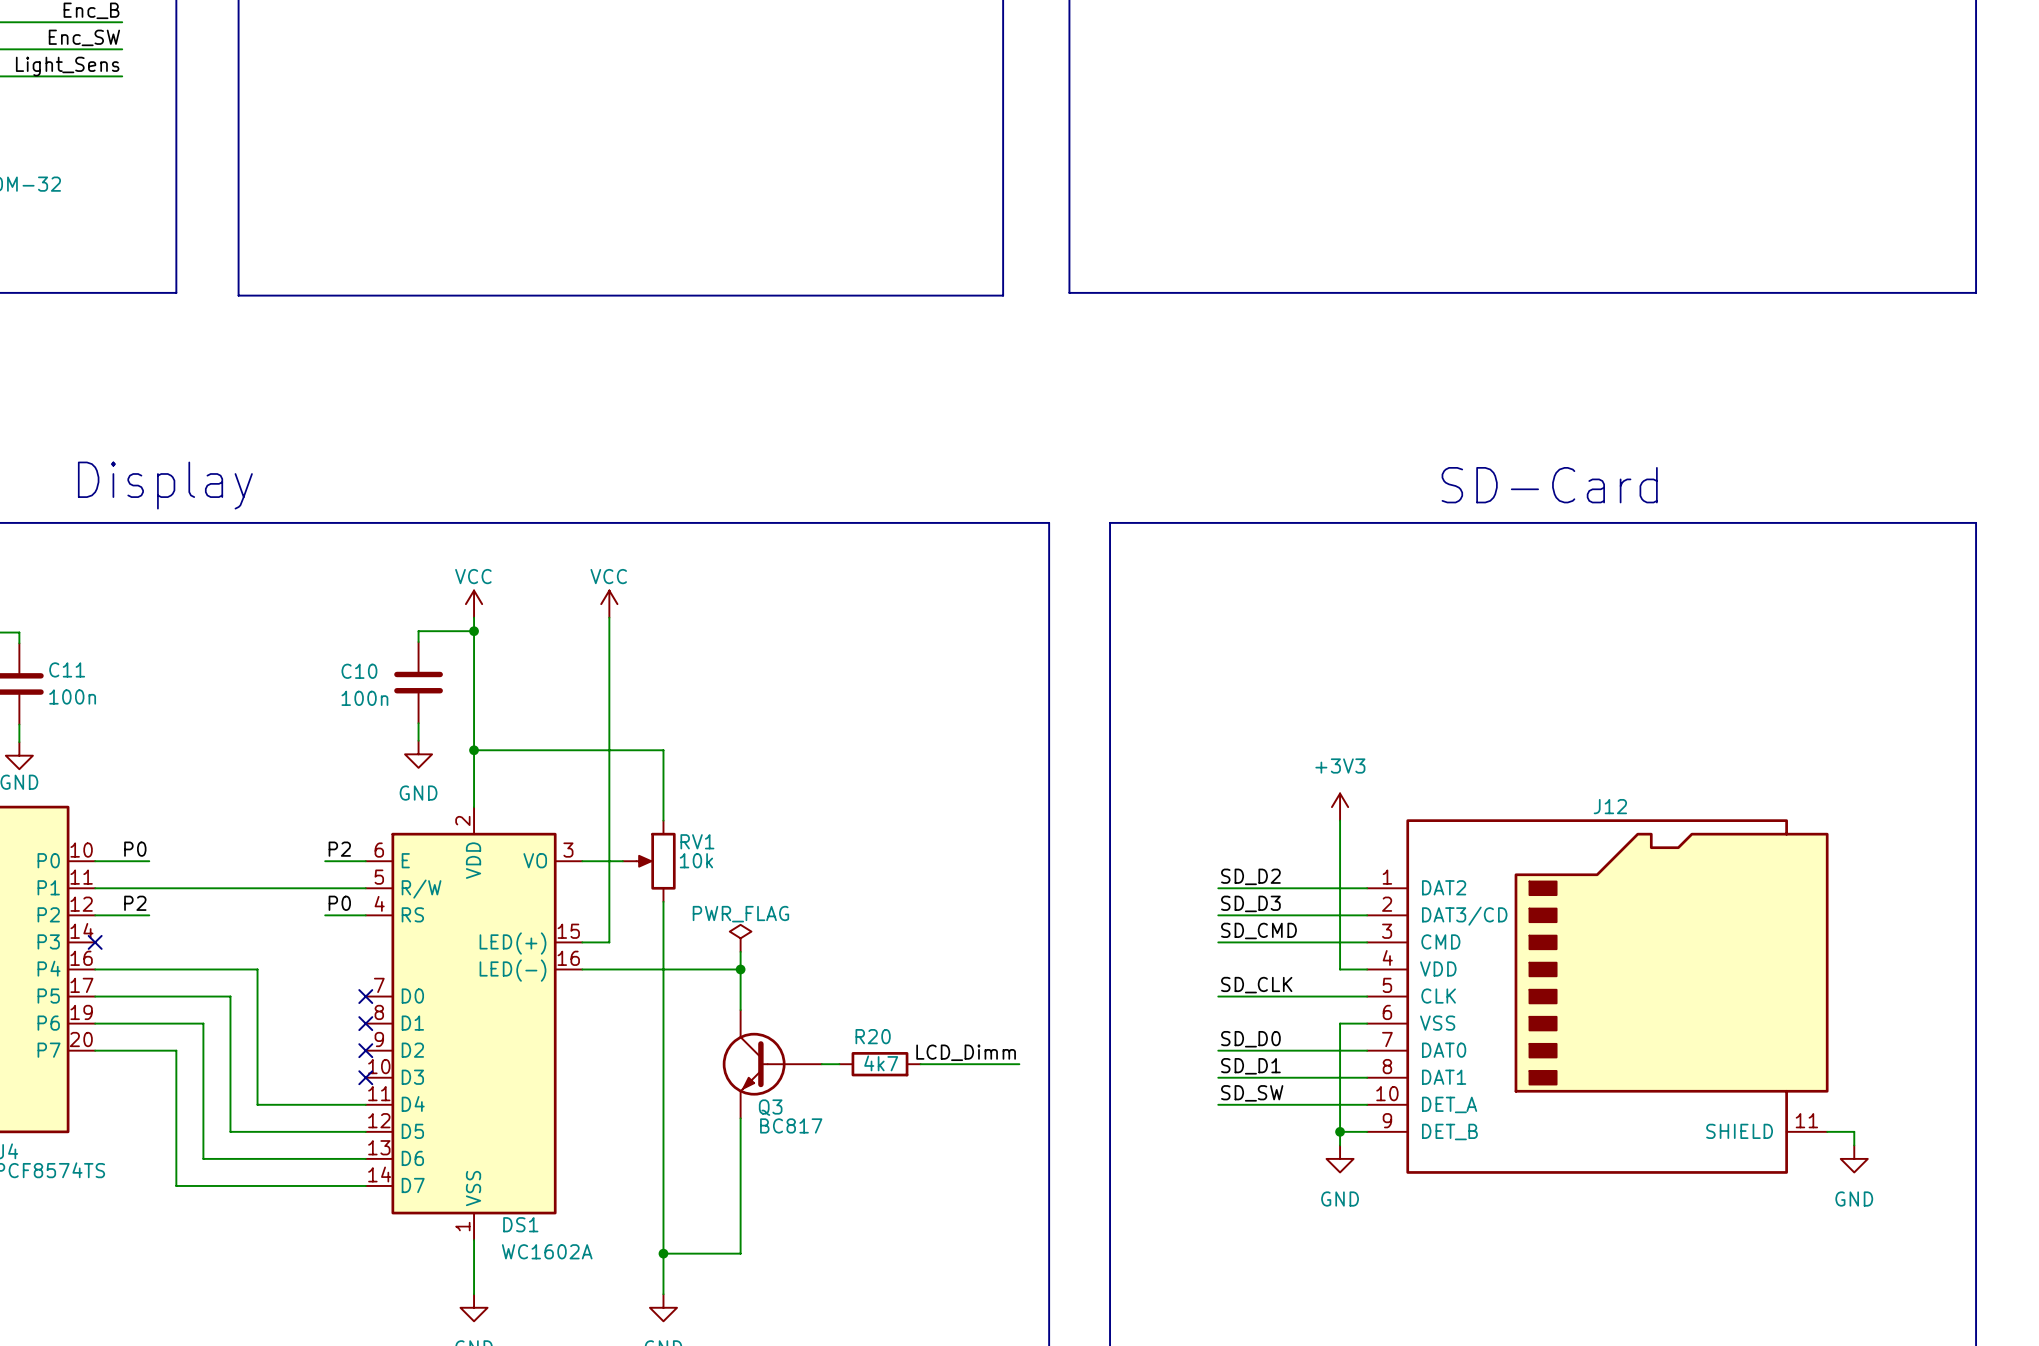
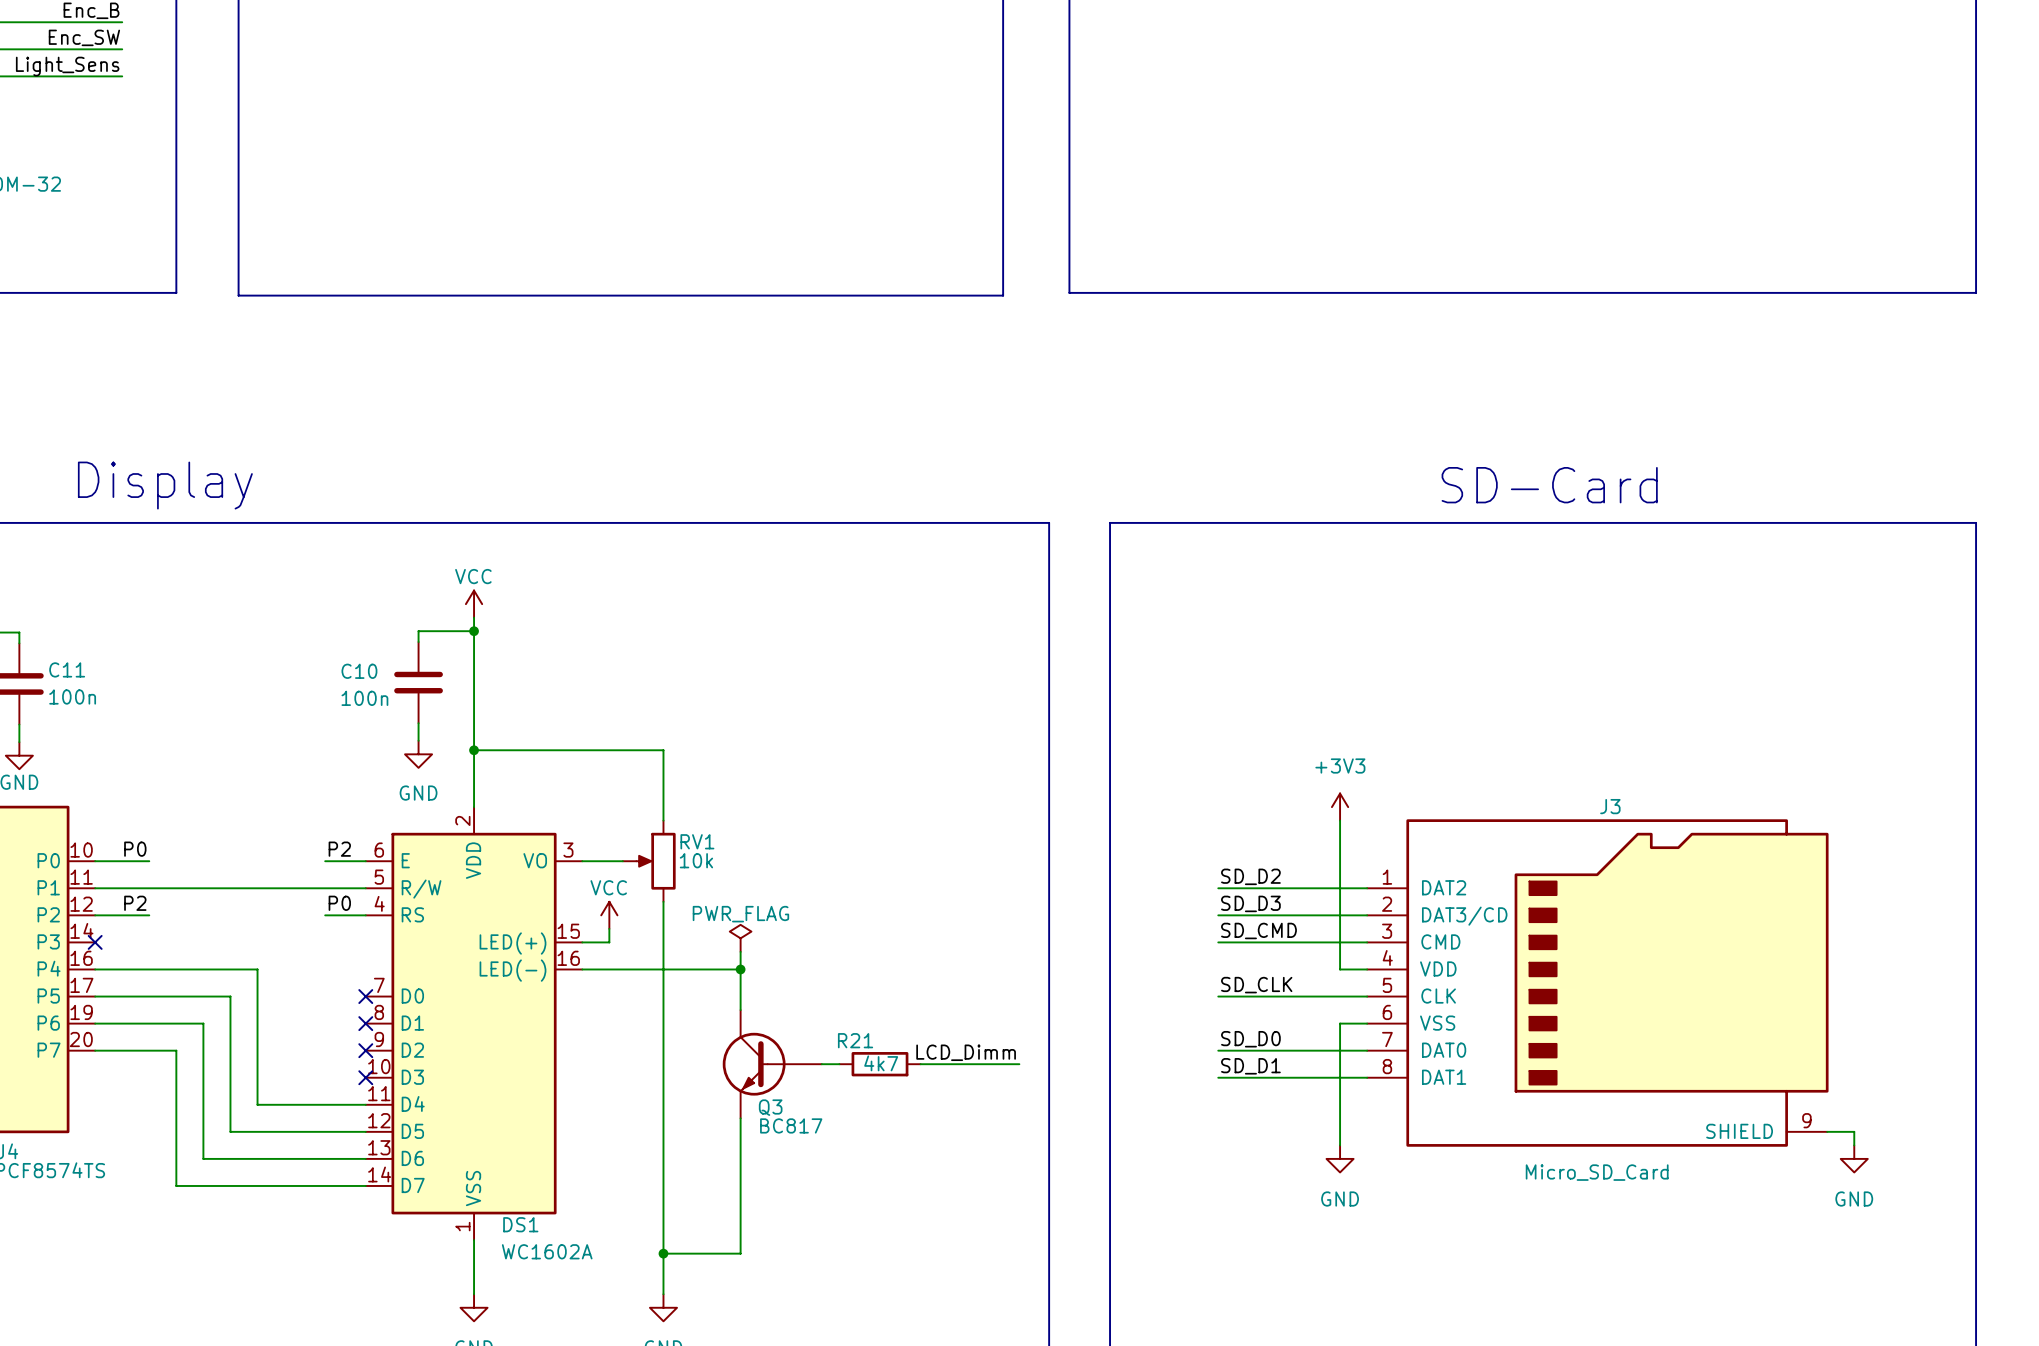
power symbol: VCC (609, 604) -> none
wire: (609, 617) (609, 928) -> none
power symbol: none -> VCC (609, 915)
J3: none -> Micro_SD_Card (1597, 983)
J12: (1597, 996) -> none
R20 name: R20 (873, 1036) -> R21 (855, 1040)
label: SD_SW (1252, 1093) -> none
wire: (1218, 1104) (1367, 1104) -> none
wire: (1340, 1131) (1367, 1131) -> none
junction: (1340, 1131) -> none

